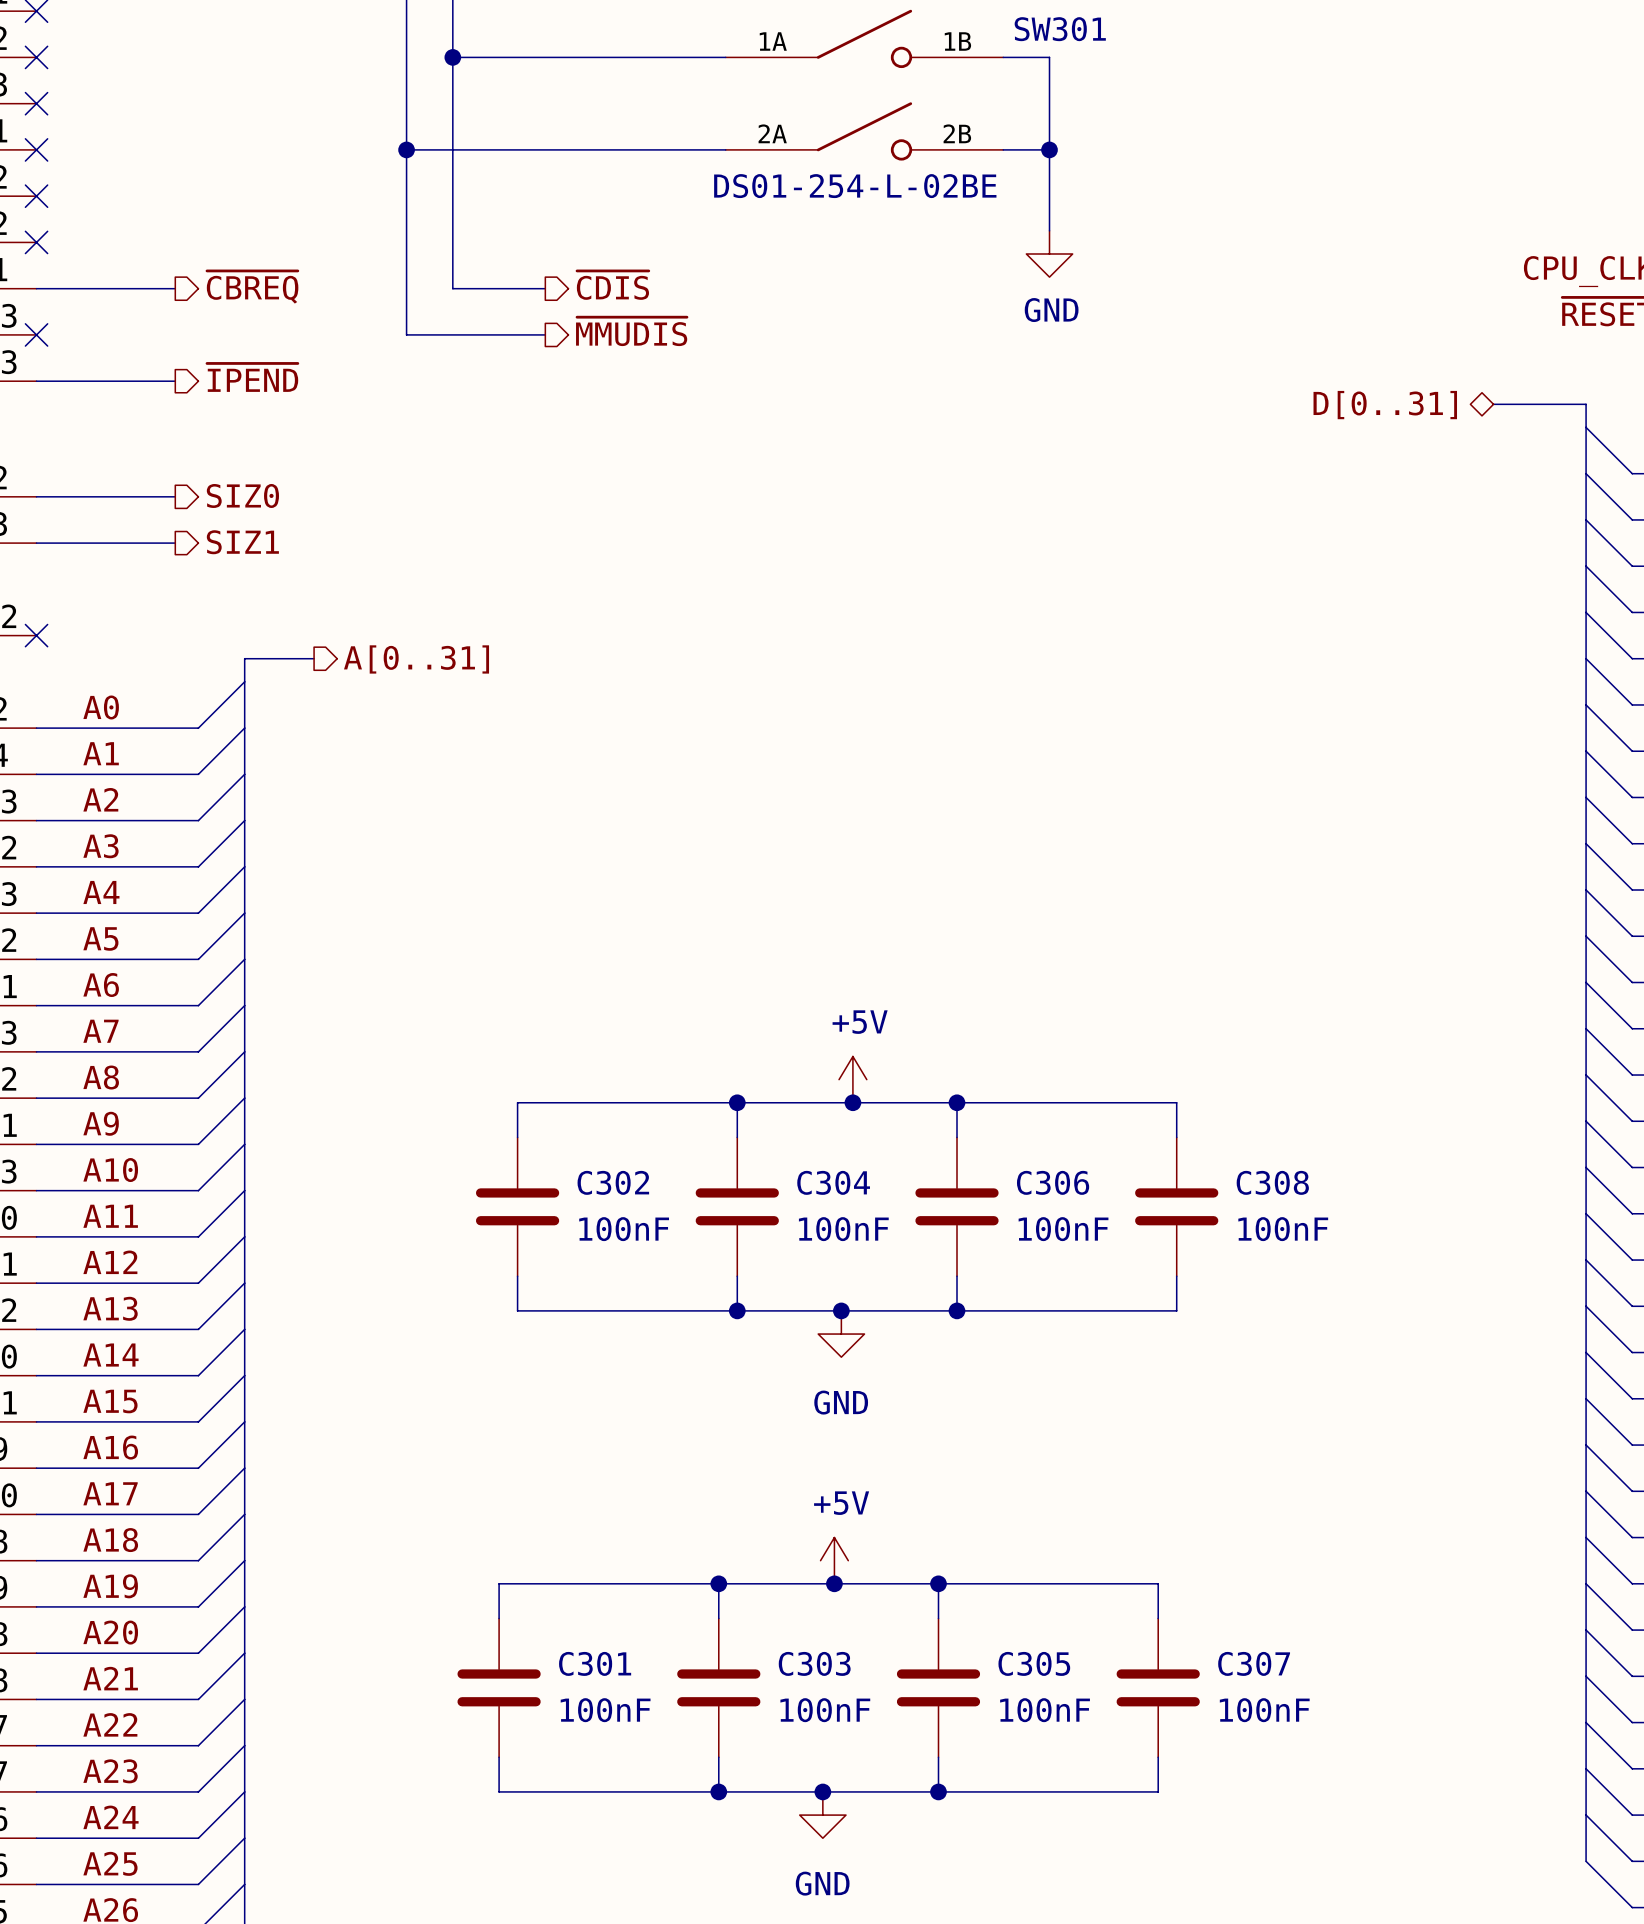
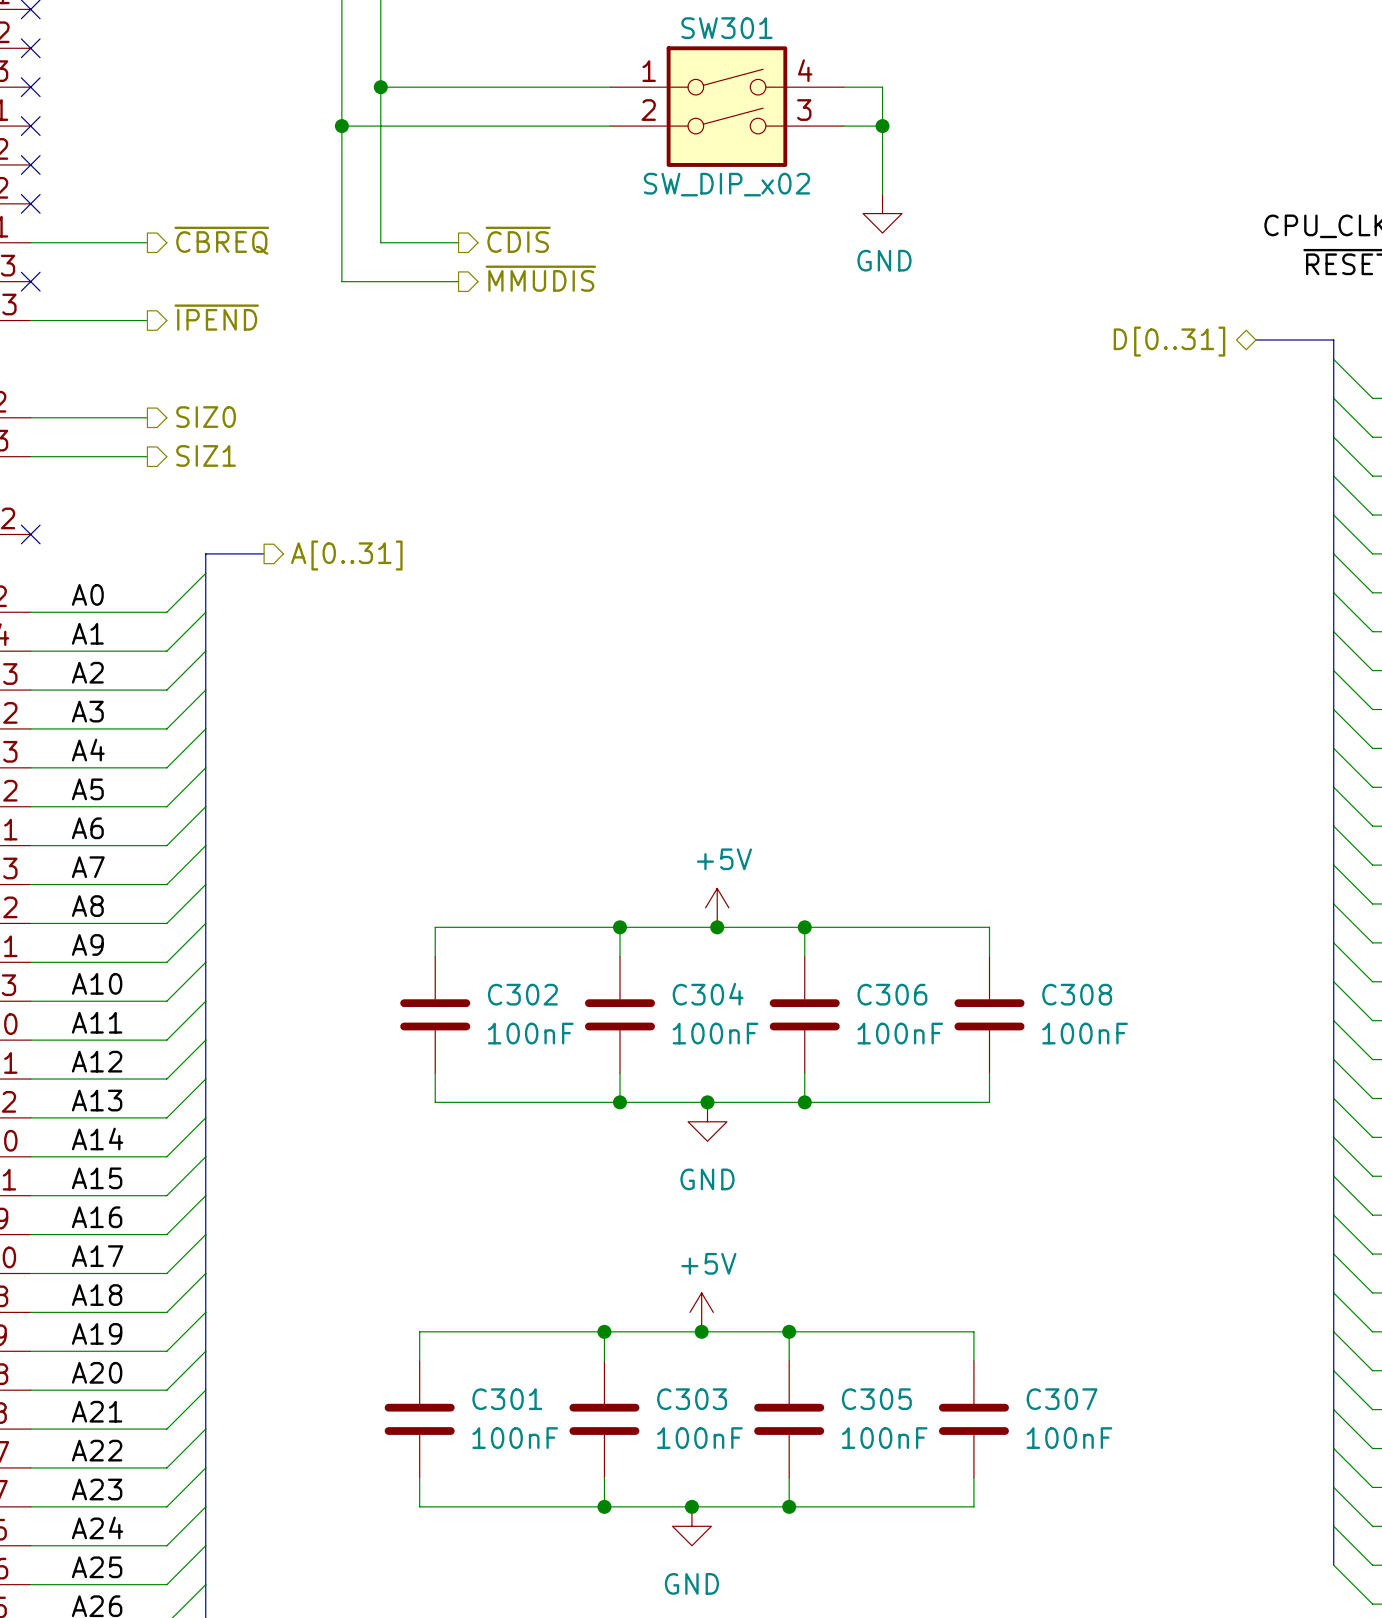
SW301 symbol: [725, 9, 1004, 161] -> [610, 46, 844, 167]
SW301 name position: SW301 (1060, 29) -> SW301 (726, 28)
wire: (452, 57) (725, 57) -> (380, 87) (610, 87)
junction position: (452, 57) -> (380, 87)
wire: (1003, 57) (1049, 57) (1049, 103) -> (843, 87) (882, 87)
SW301 value: DS01-254-L-02BE (855, 186) -> SW_DIP_x02 (726, 184)

